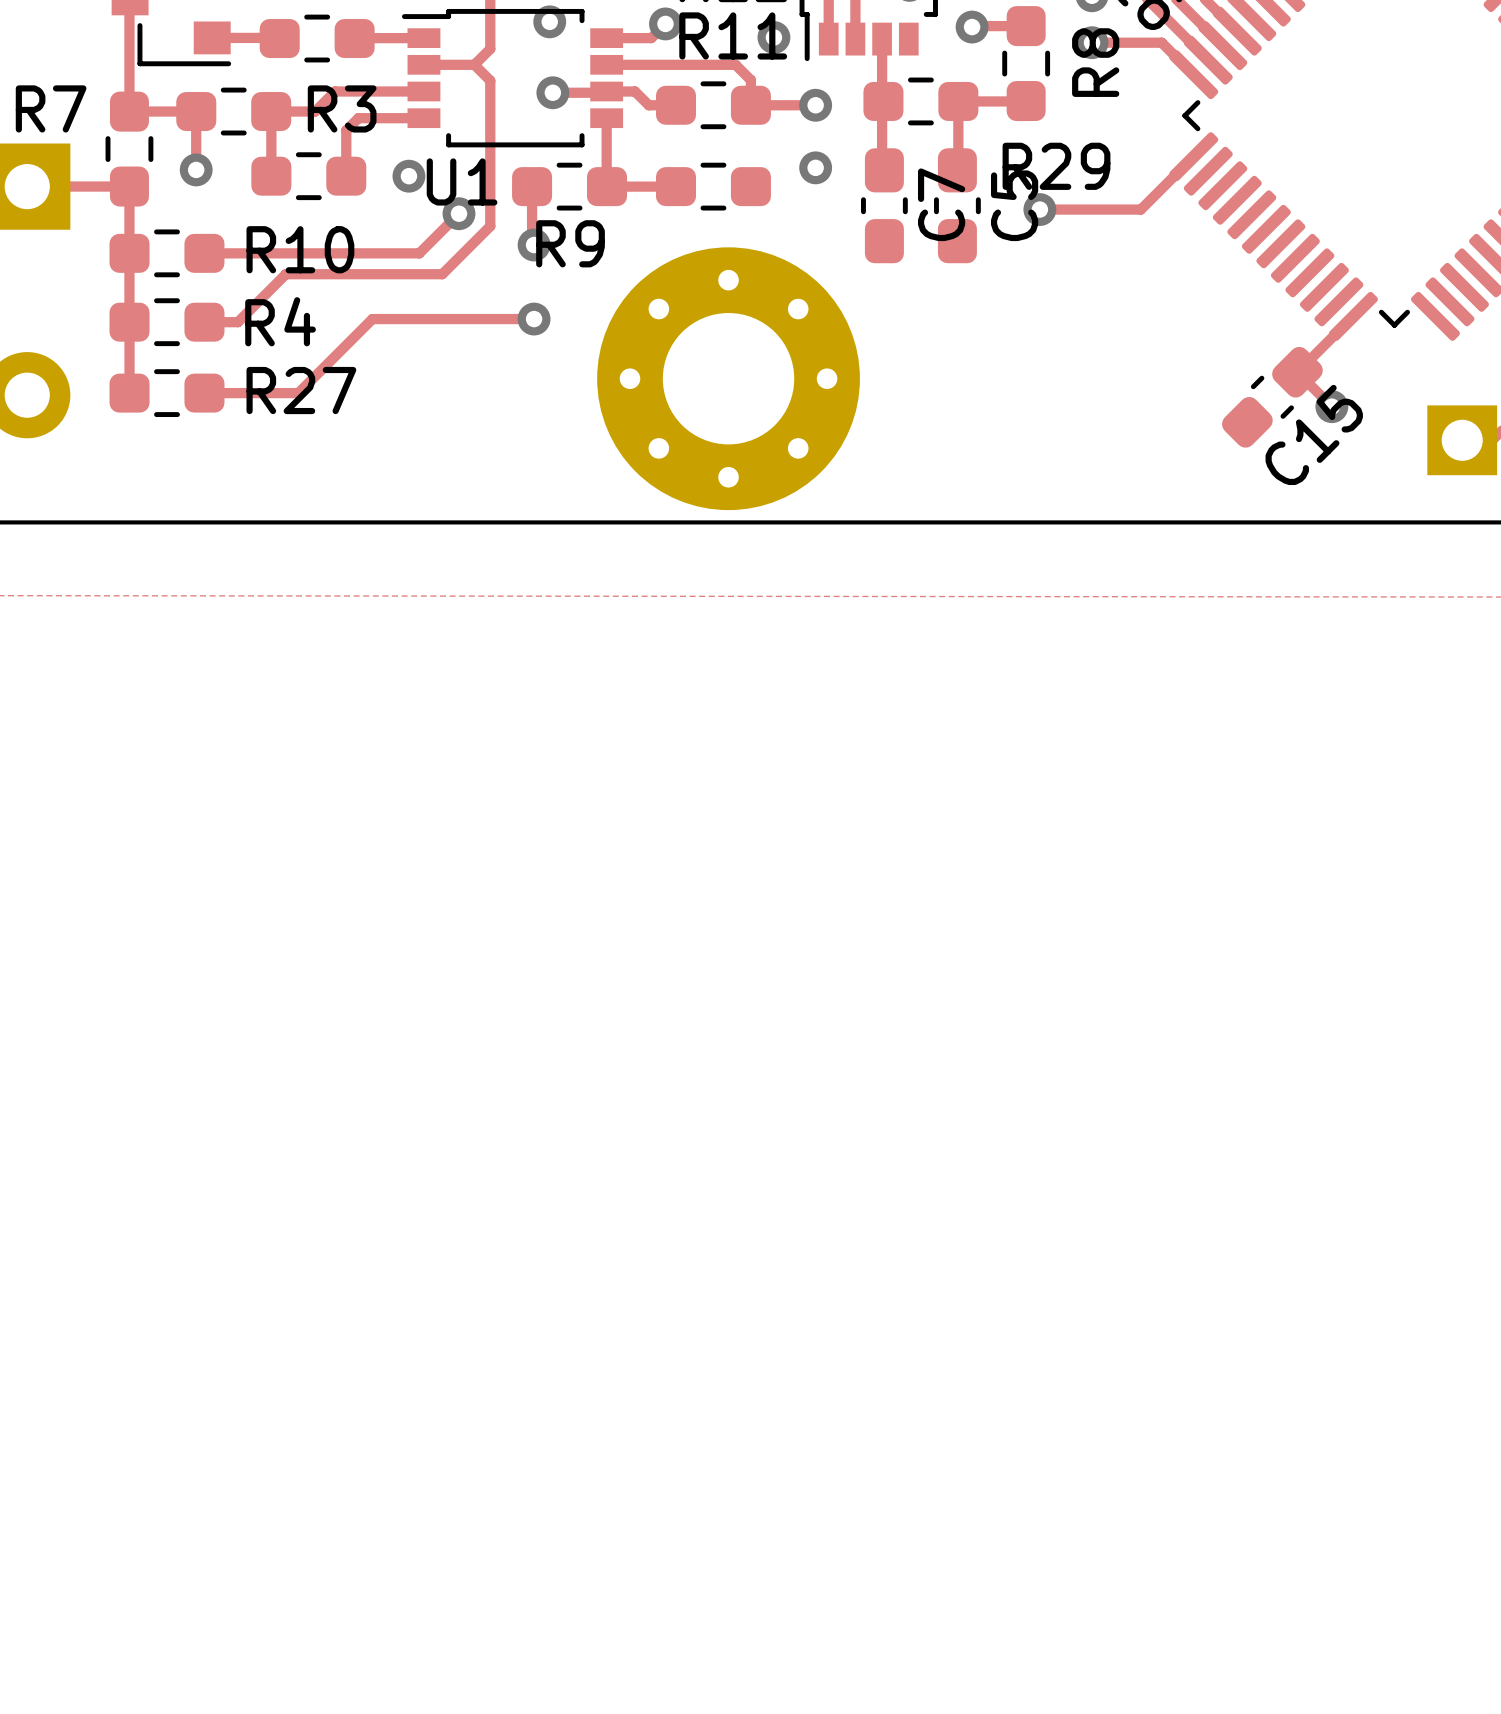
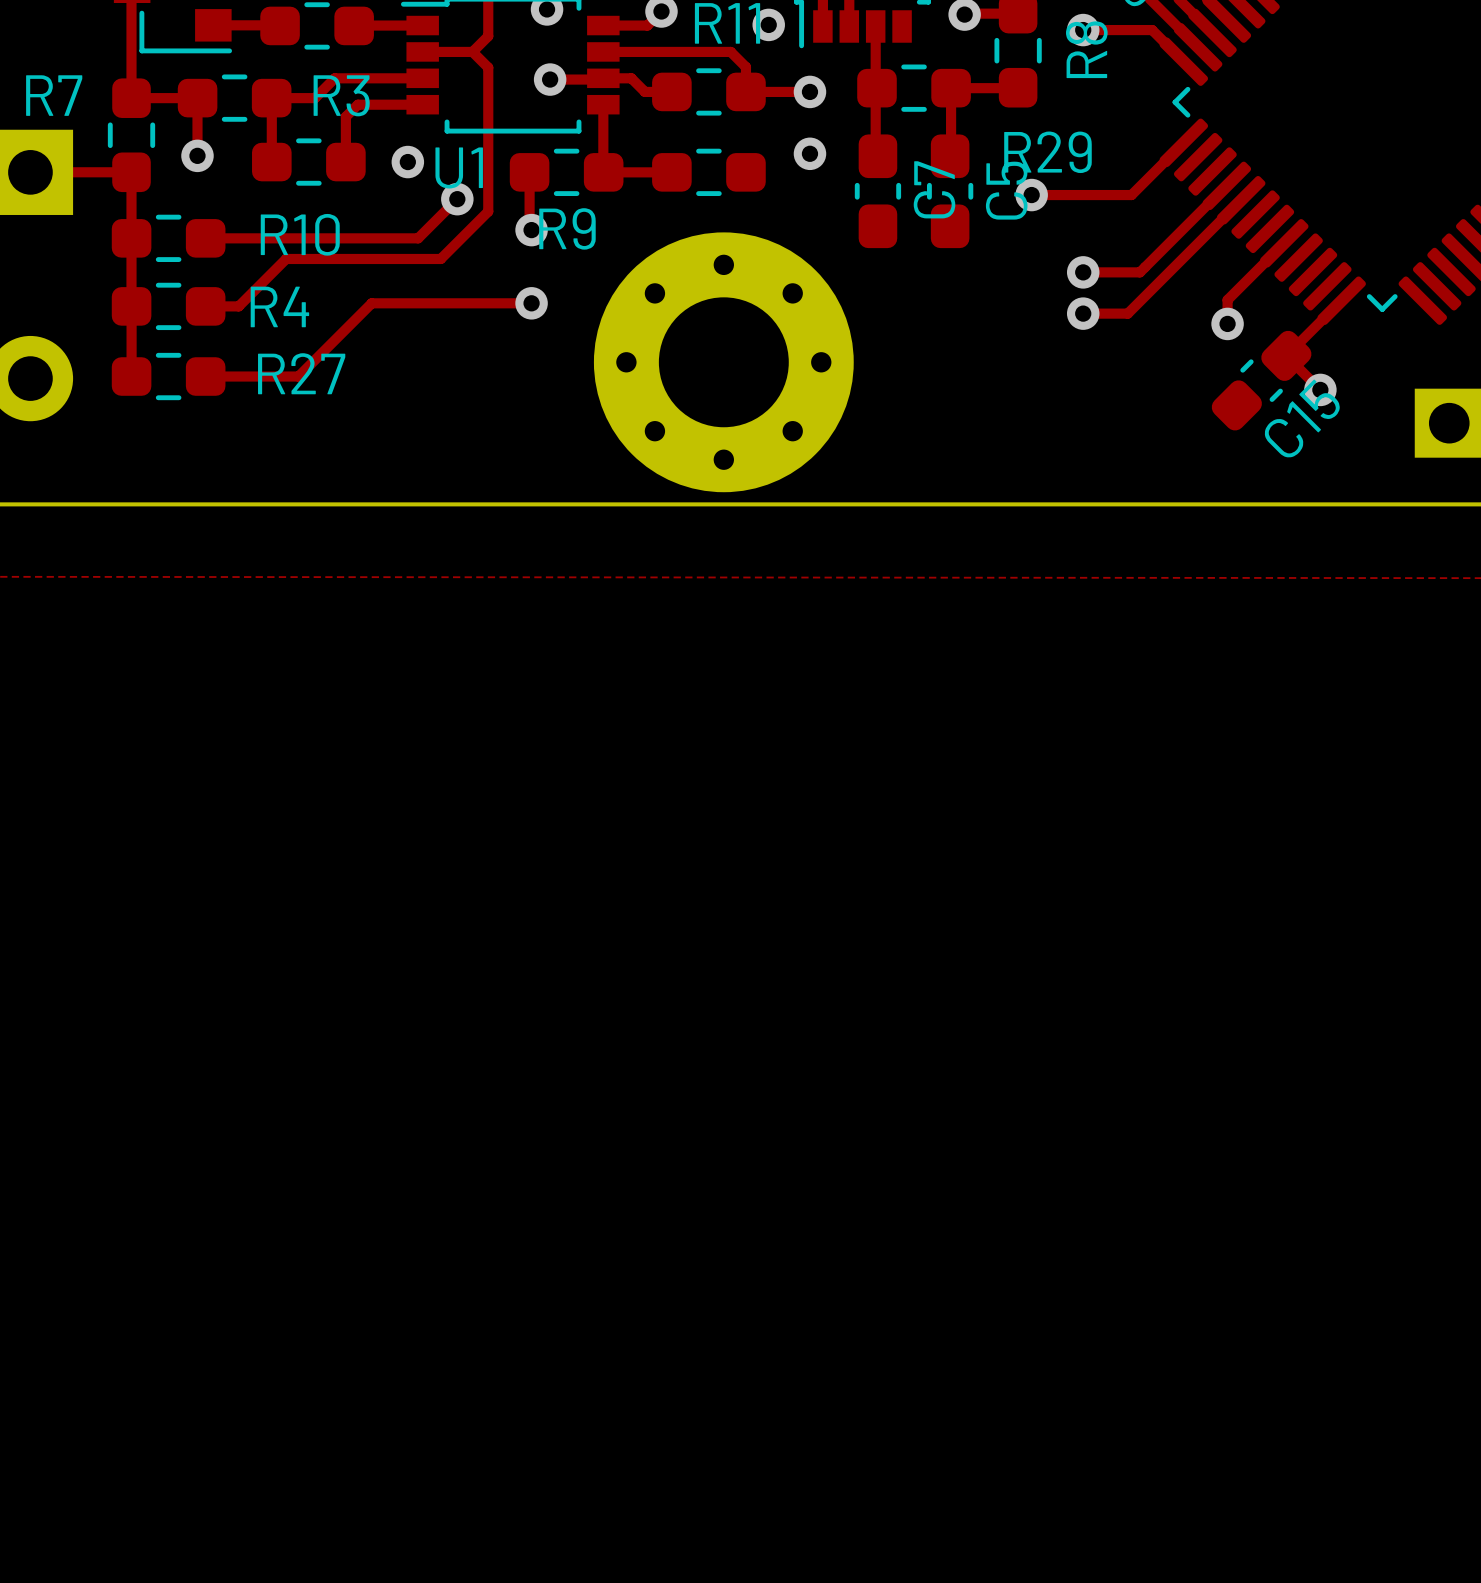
track: none -> (1226, 185) (1139, 272) (1083, 272)
track: none -> (1241, 200) (1127, 313) (1083, 313)
track: none -> (1284, 243) (1227, 299) (1227, 323)
via: none -> (1083, 272)
via: none -> (1083, 313)
via: none -> (1227, 323)

